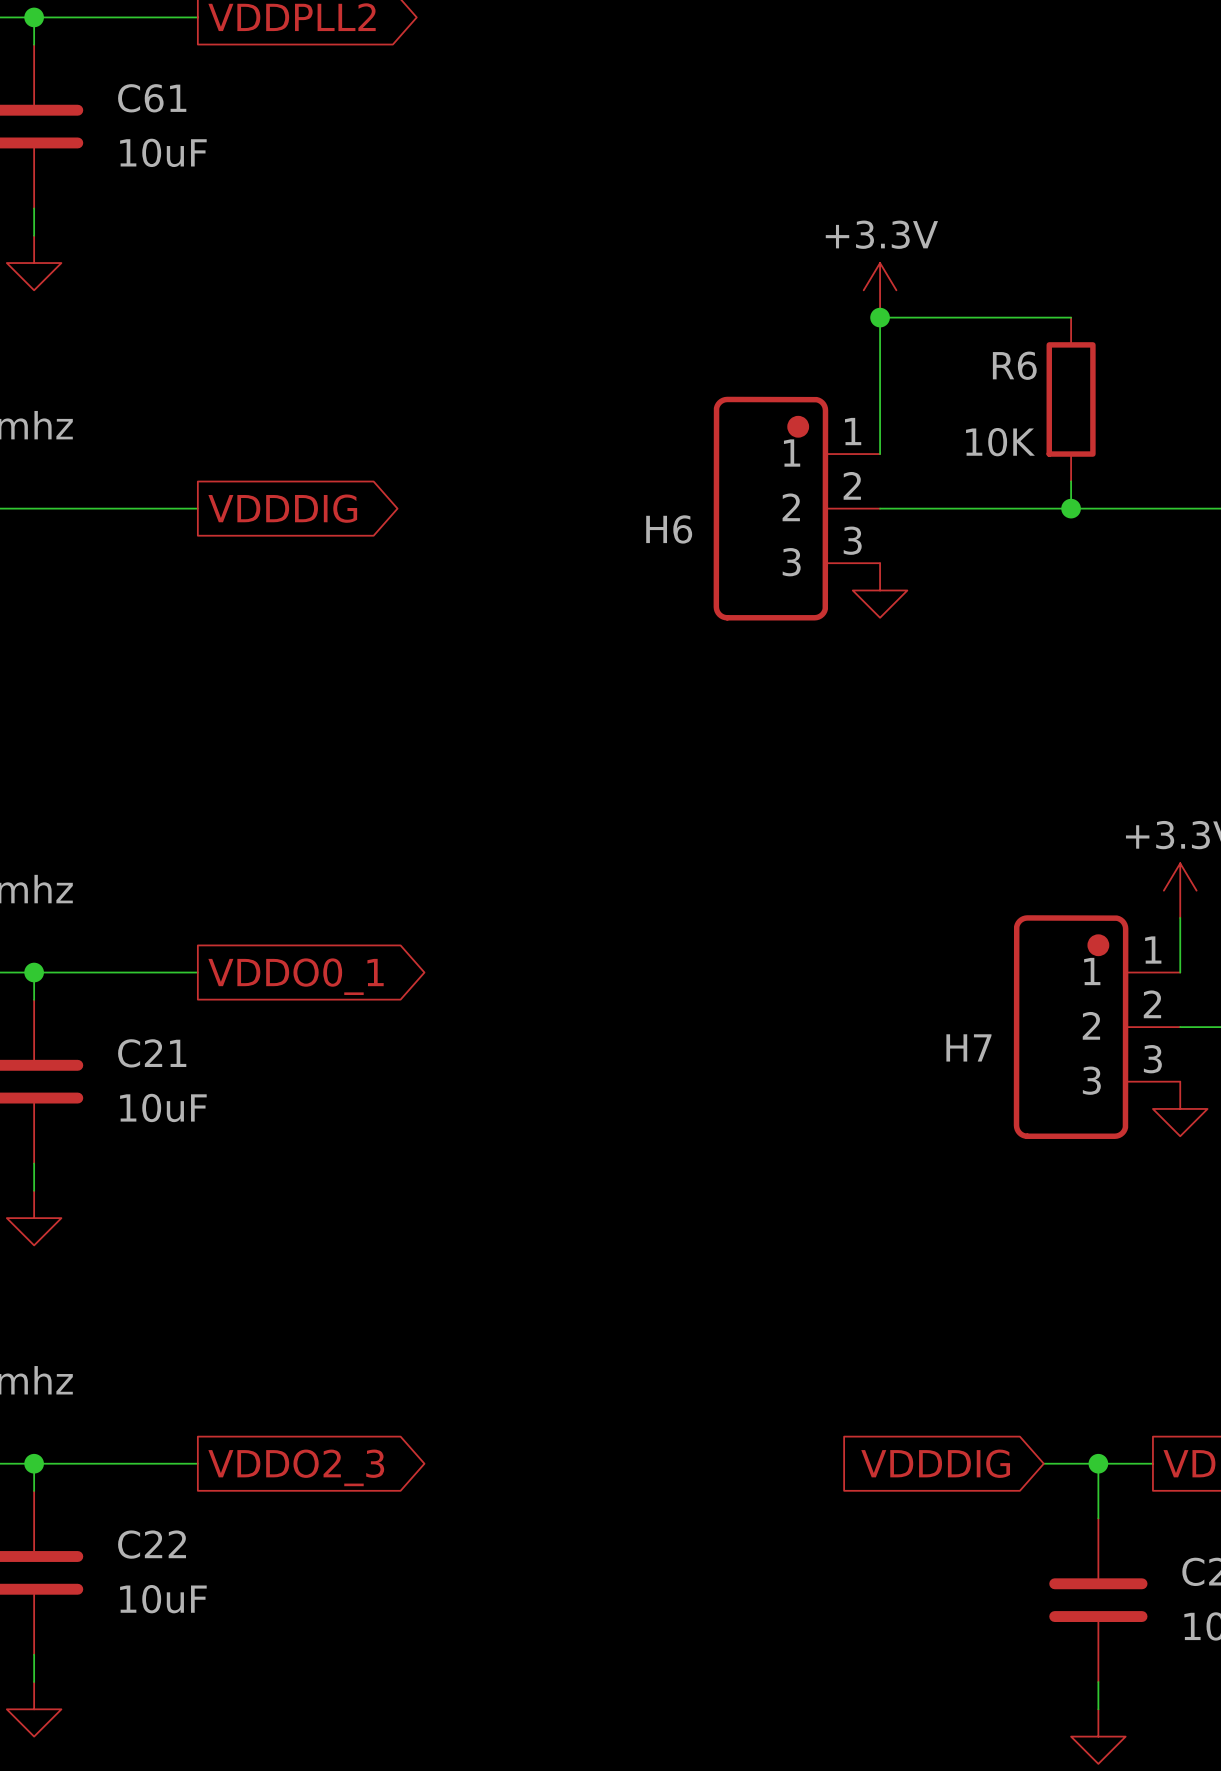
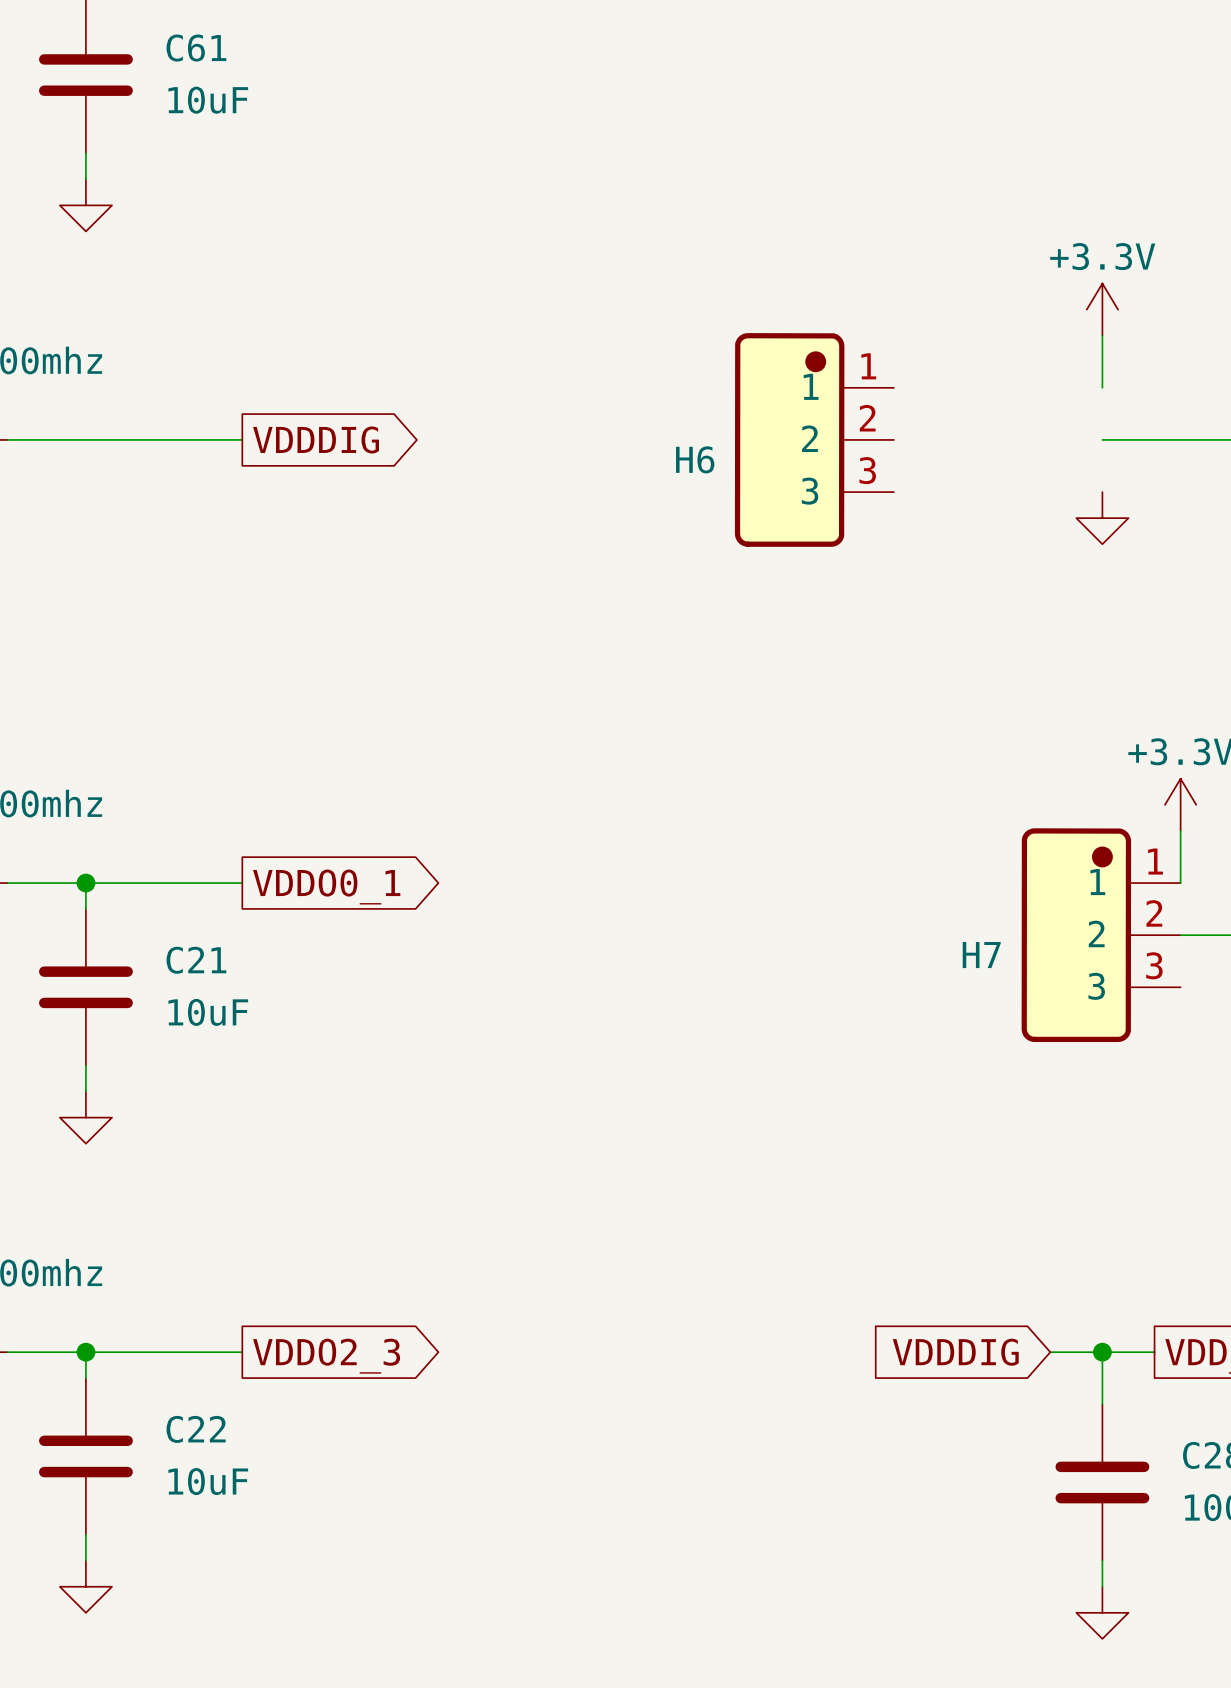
power symbol position: +3.3V (880, 290) -> +3.3V (1102, 309)
junction: (880, 317) -> none
wire: (1071, 317) (880, 317) (880, 454) -> none
R6: 10K (1071, 399) -> none
wire: none -> (1102, 335) (1102, 387)
wire: (1071, 481) (1071, 508) -> none
wire: (880, 508) (1098, 508) -> none
junction: (1071, 508) -> none
power symbol position: (880, 590) -> (1102, 518)
power symbol: (1180, 1108) -> none

